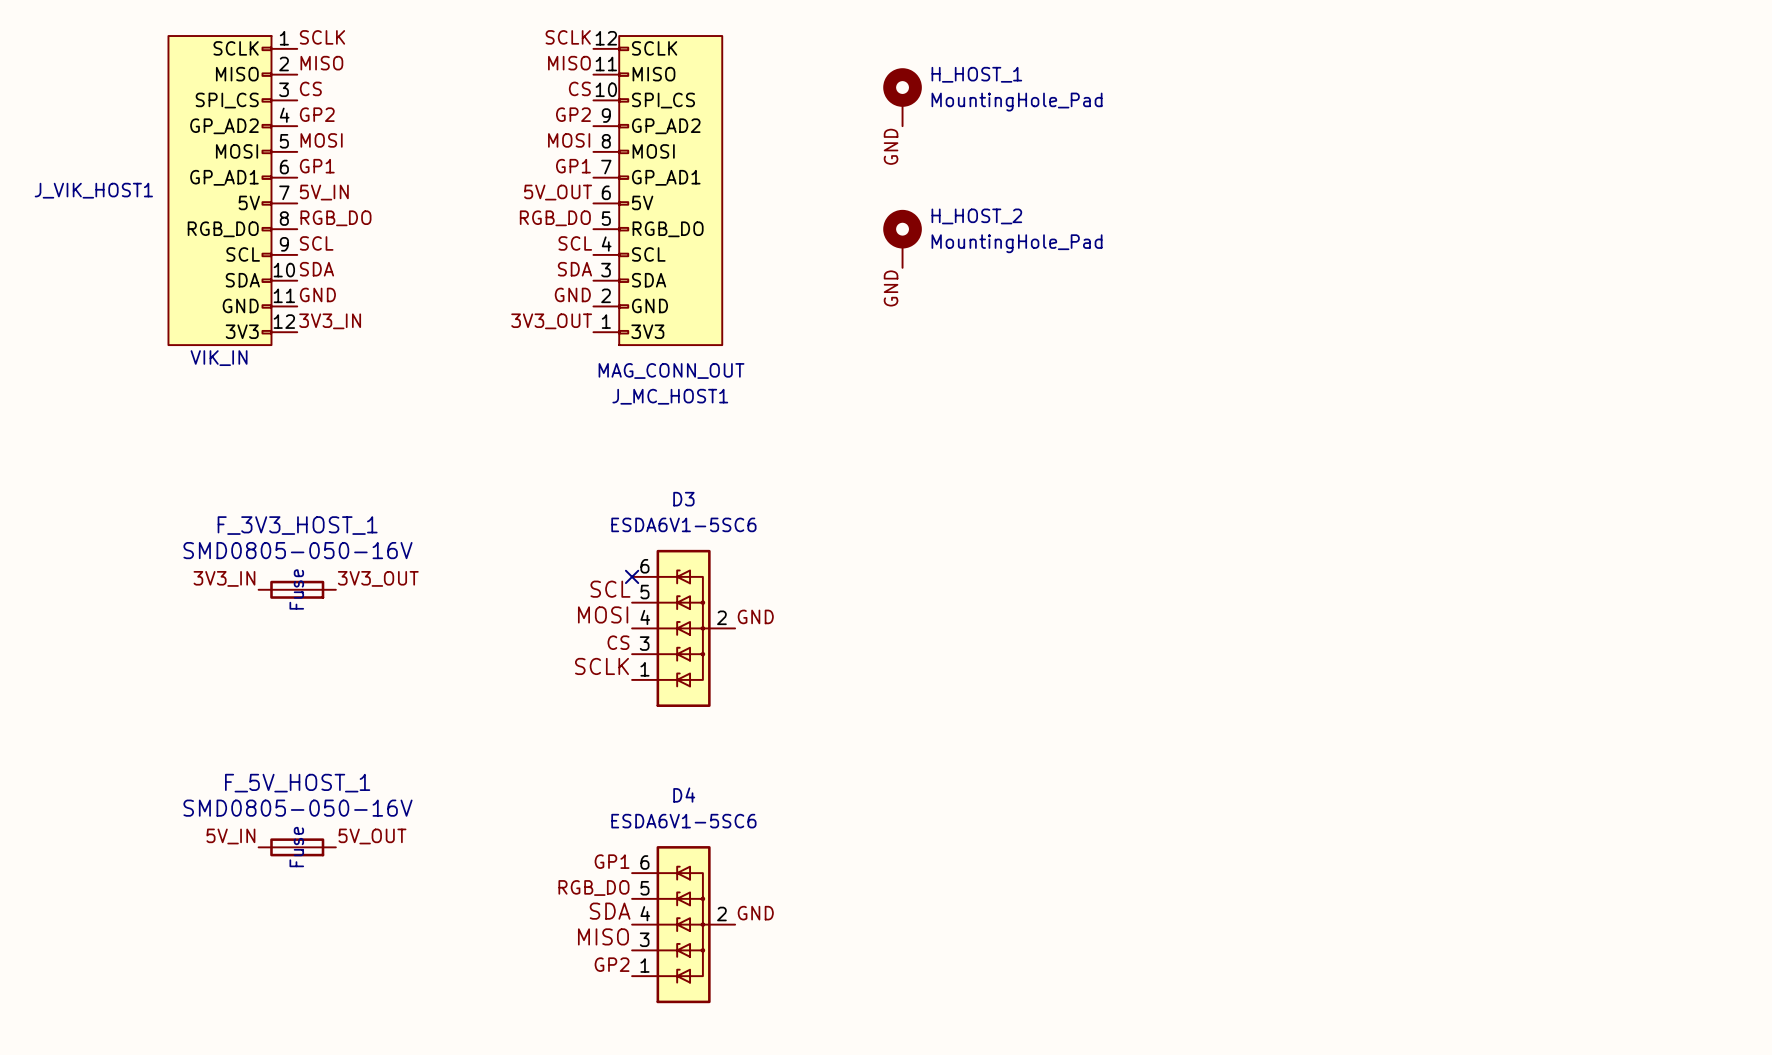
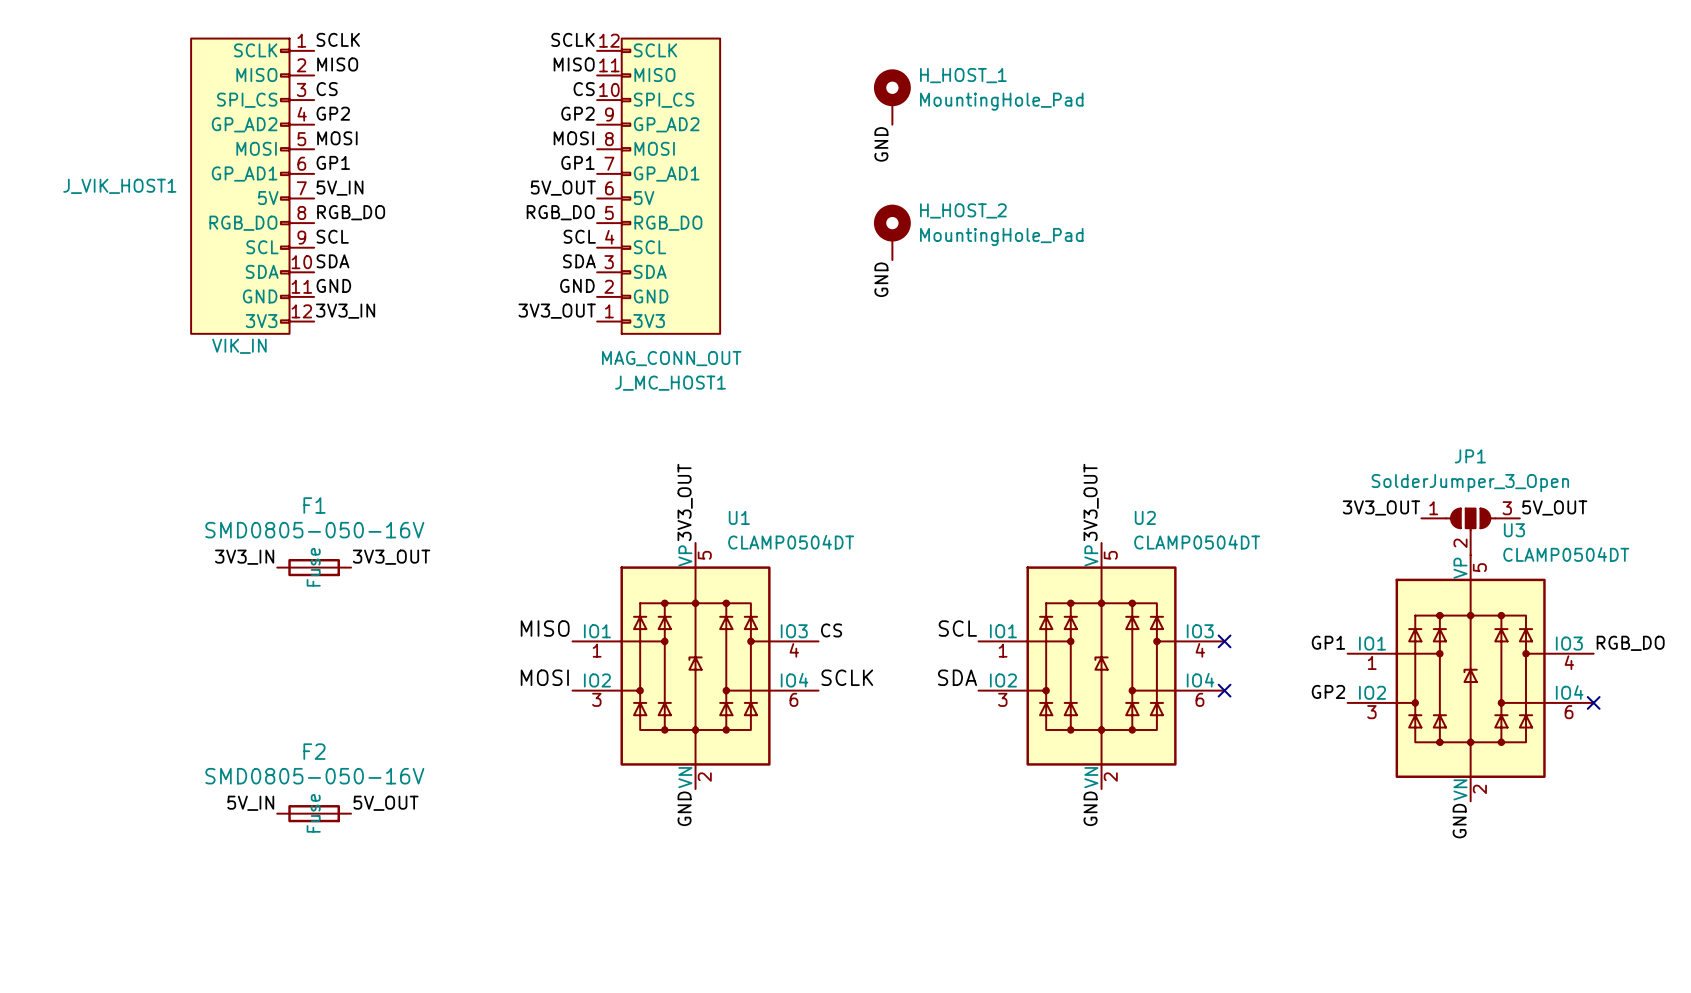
label: none -> 3V3_OUT (685, 502)
label: none -> 3V3_OUT (1091, 502)
F_3V3_HOST_1 name: F_3V3_HOST_1 (297, 525) -> F1 (314, 505)
label: none -> 3V3_OUT (1381, 507)
label: none -> 5V_OUT (1554, 507)
JP1: none -> SolderJumper_3_Open (1470, 531)
no-connect mark: (632, 576) -> none
label: SCL (610, 589) -> none
label position: MOSI (603, 614) -> MOSI (544, 677)
label: GND (755, 616) -> none
D3: ESDA6V1-5SC6 (683, 628) -> none
label position: CS (618, 642) -> CS (831, 630)
label: none -> MISO (545, 628)
label: none -> SCL (957, 628)
label position: SCLK (602, 666) -> SCLK (847, 677)
no-connect mark: none -> (1224, 641)
label: none -> GP1 (1328, 642)
label: none -> RGB_DO (1630, 643)
U1: none -> CLAMP0504DT (695, 666)
U2: none -> CLAMP0504DT (1101, 666)
label: none -> SDA (957, 677)
U3: none -> CLAMP0504DT (1470, 678)
no-connect mark: none -> (1224, 690)
label: none -> GP2 (1328, 691)
no-connect mark: none -> (1593, 702)
F_5V_HOST_1 name: F_5V_HOST_1 (297, 783) -> F2 (314, 751)
label: none -> GND (684, 808)
label: none -> GND (1090, 808)
label: none -> GND (1459, 821)
label: GP1 (612, 861) -> none
label: RGB_DO (593, 887) -> none
label: SDA (610, 911) -> none
label: GND (755, 913) -> none
D4: ESDA6V1-5SC6 (683, 924) -> none
label: MISO (603, 936) -> none
label: GP2 (612, 964) -> none

